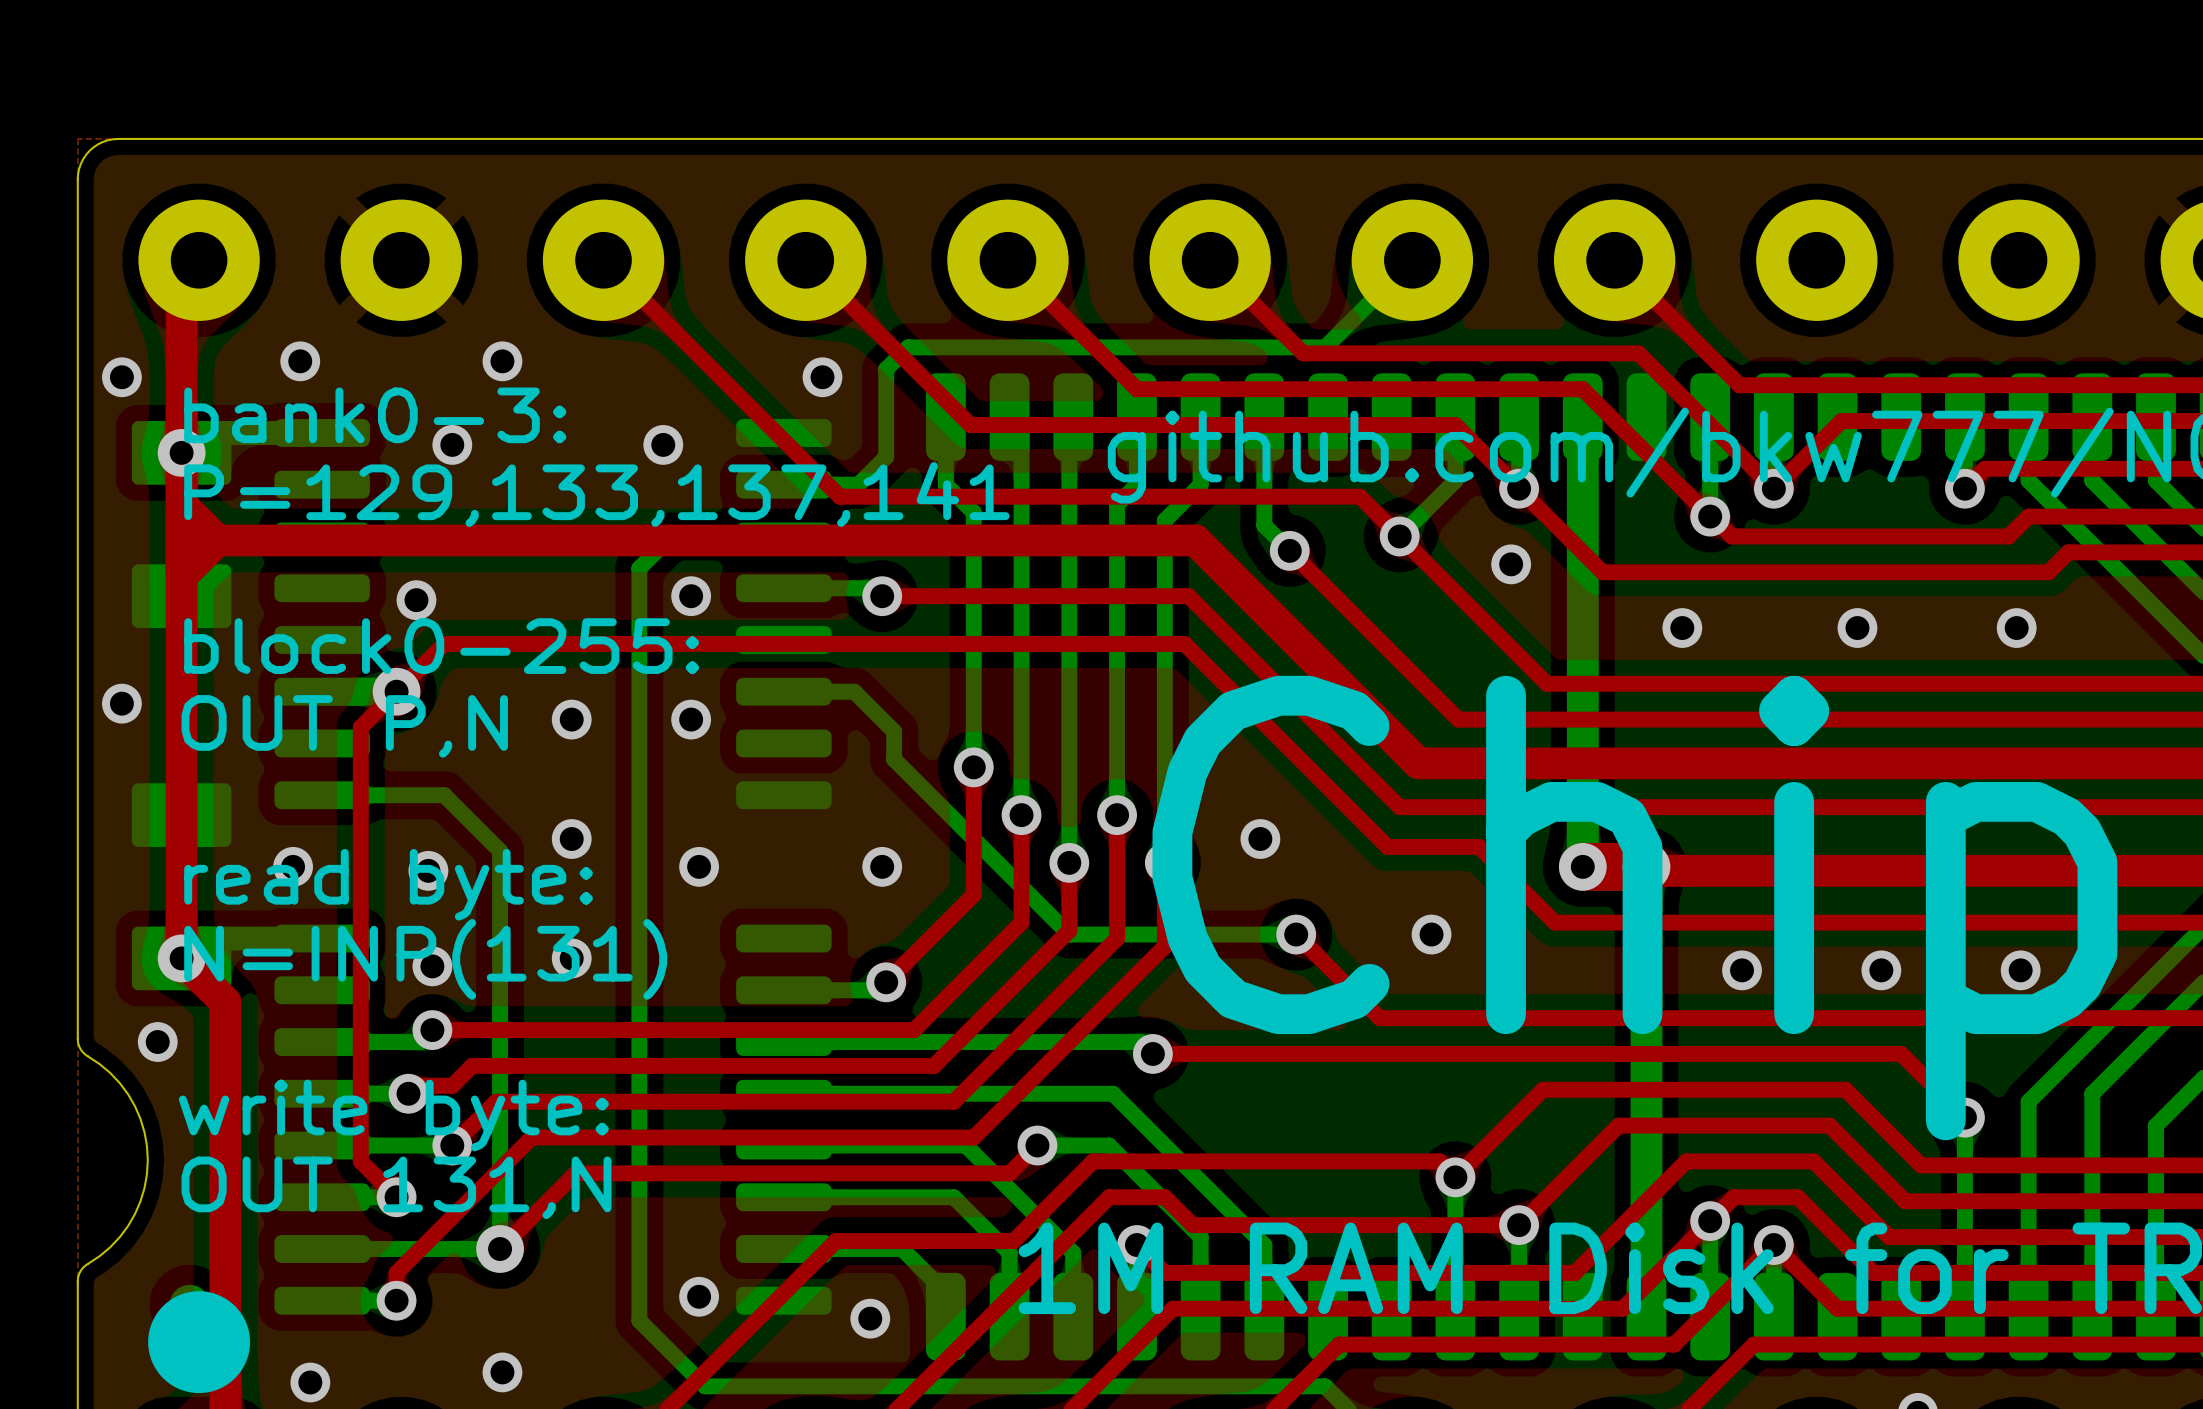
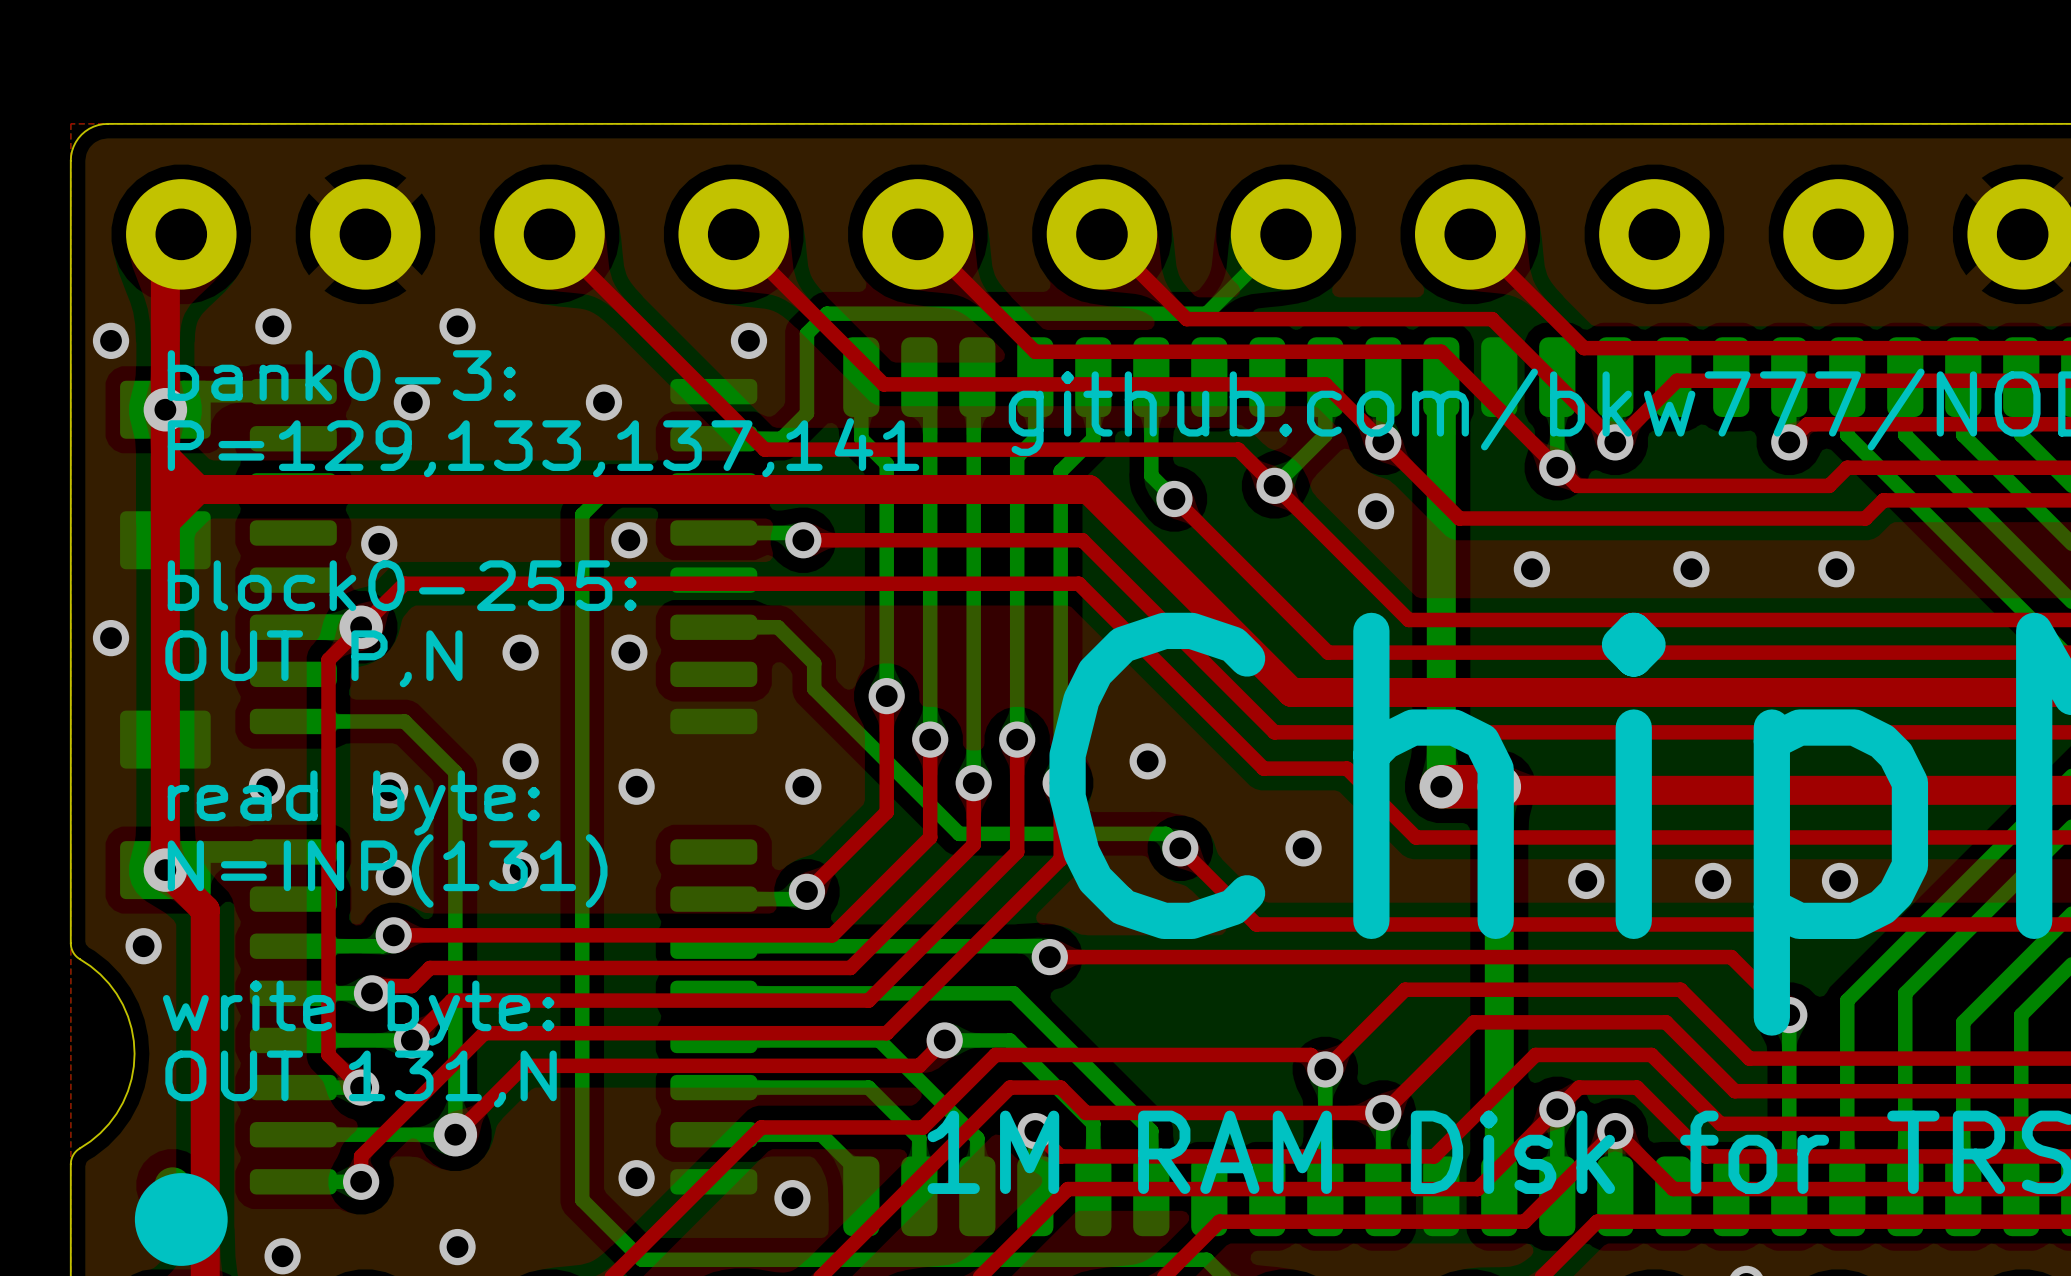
bottom track: (1053, 918) (1069, 934) (1296, 934) -> (959, 833) (1165, 833) (1180, 848)

